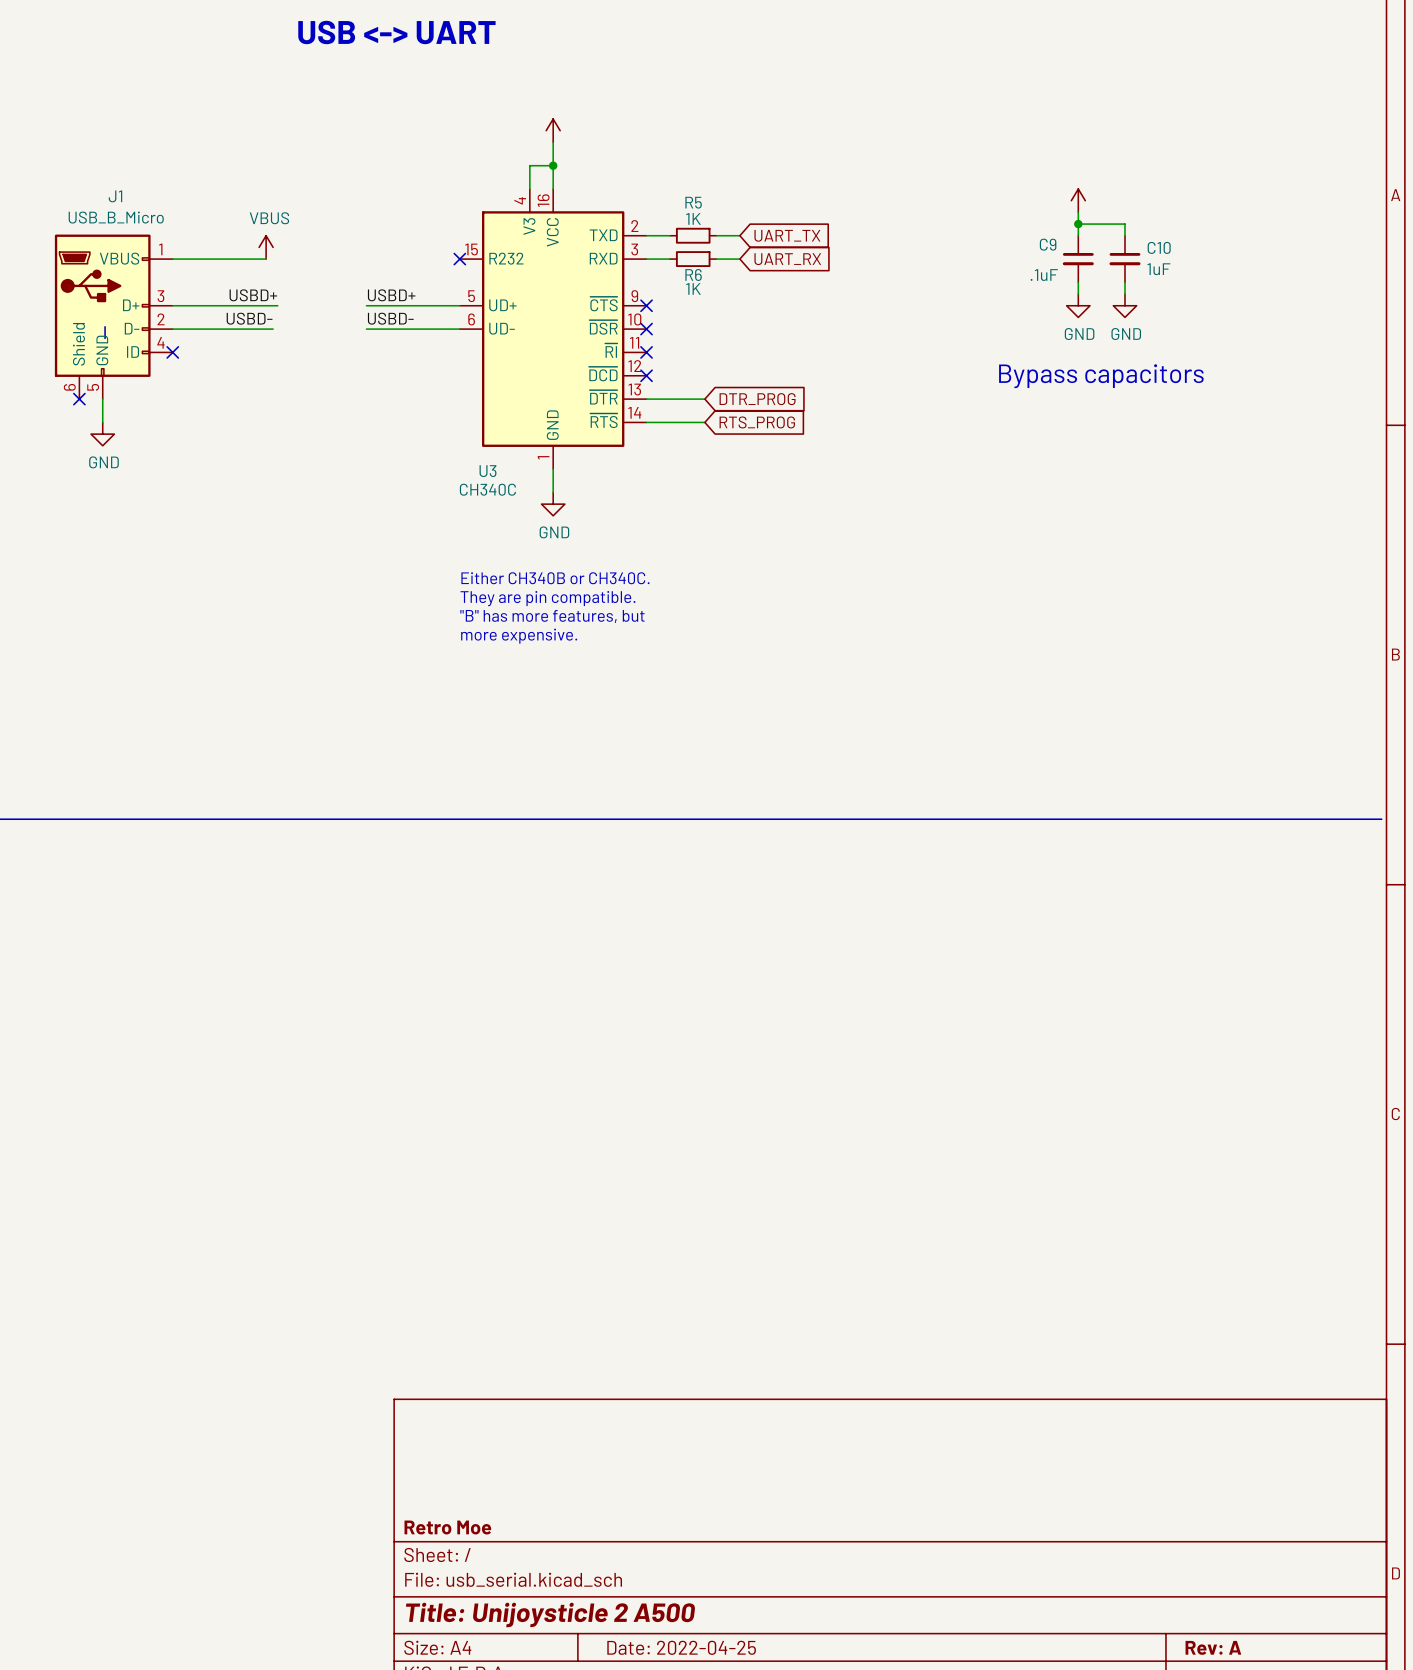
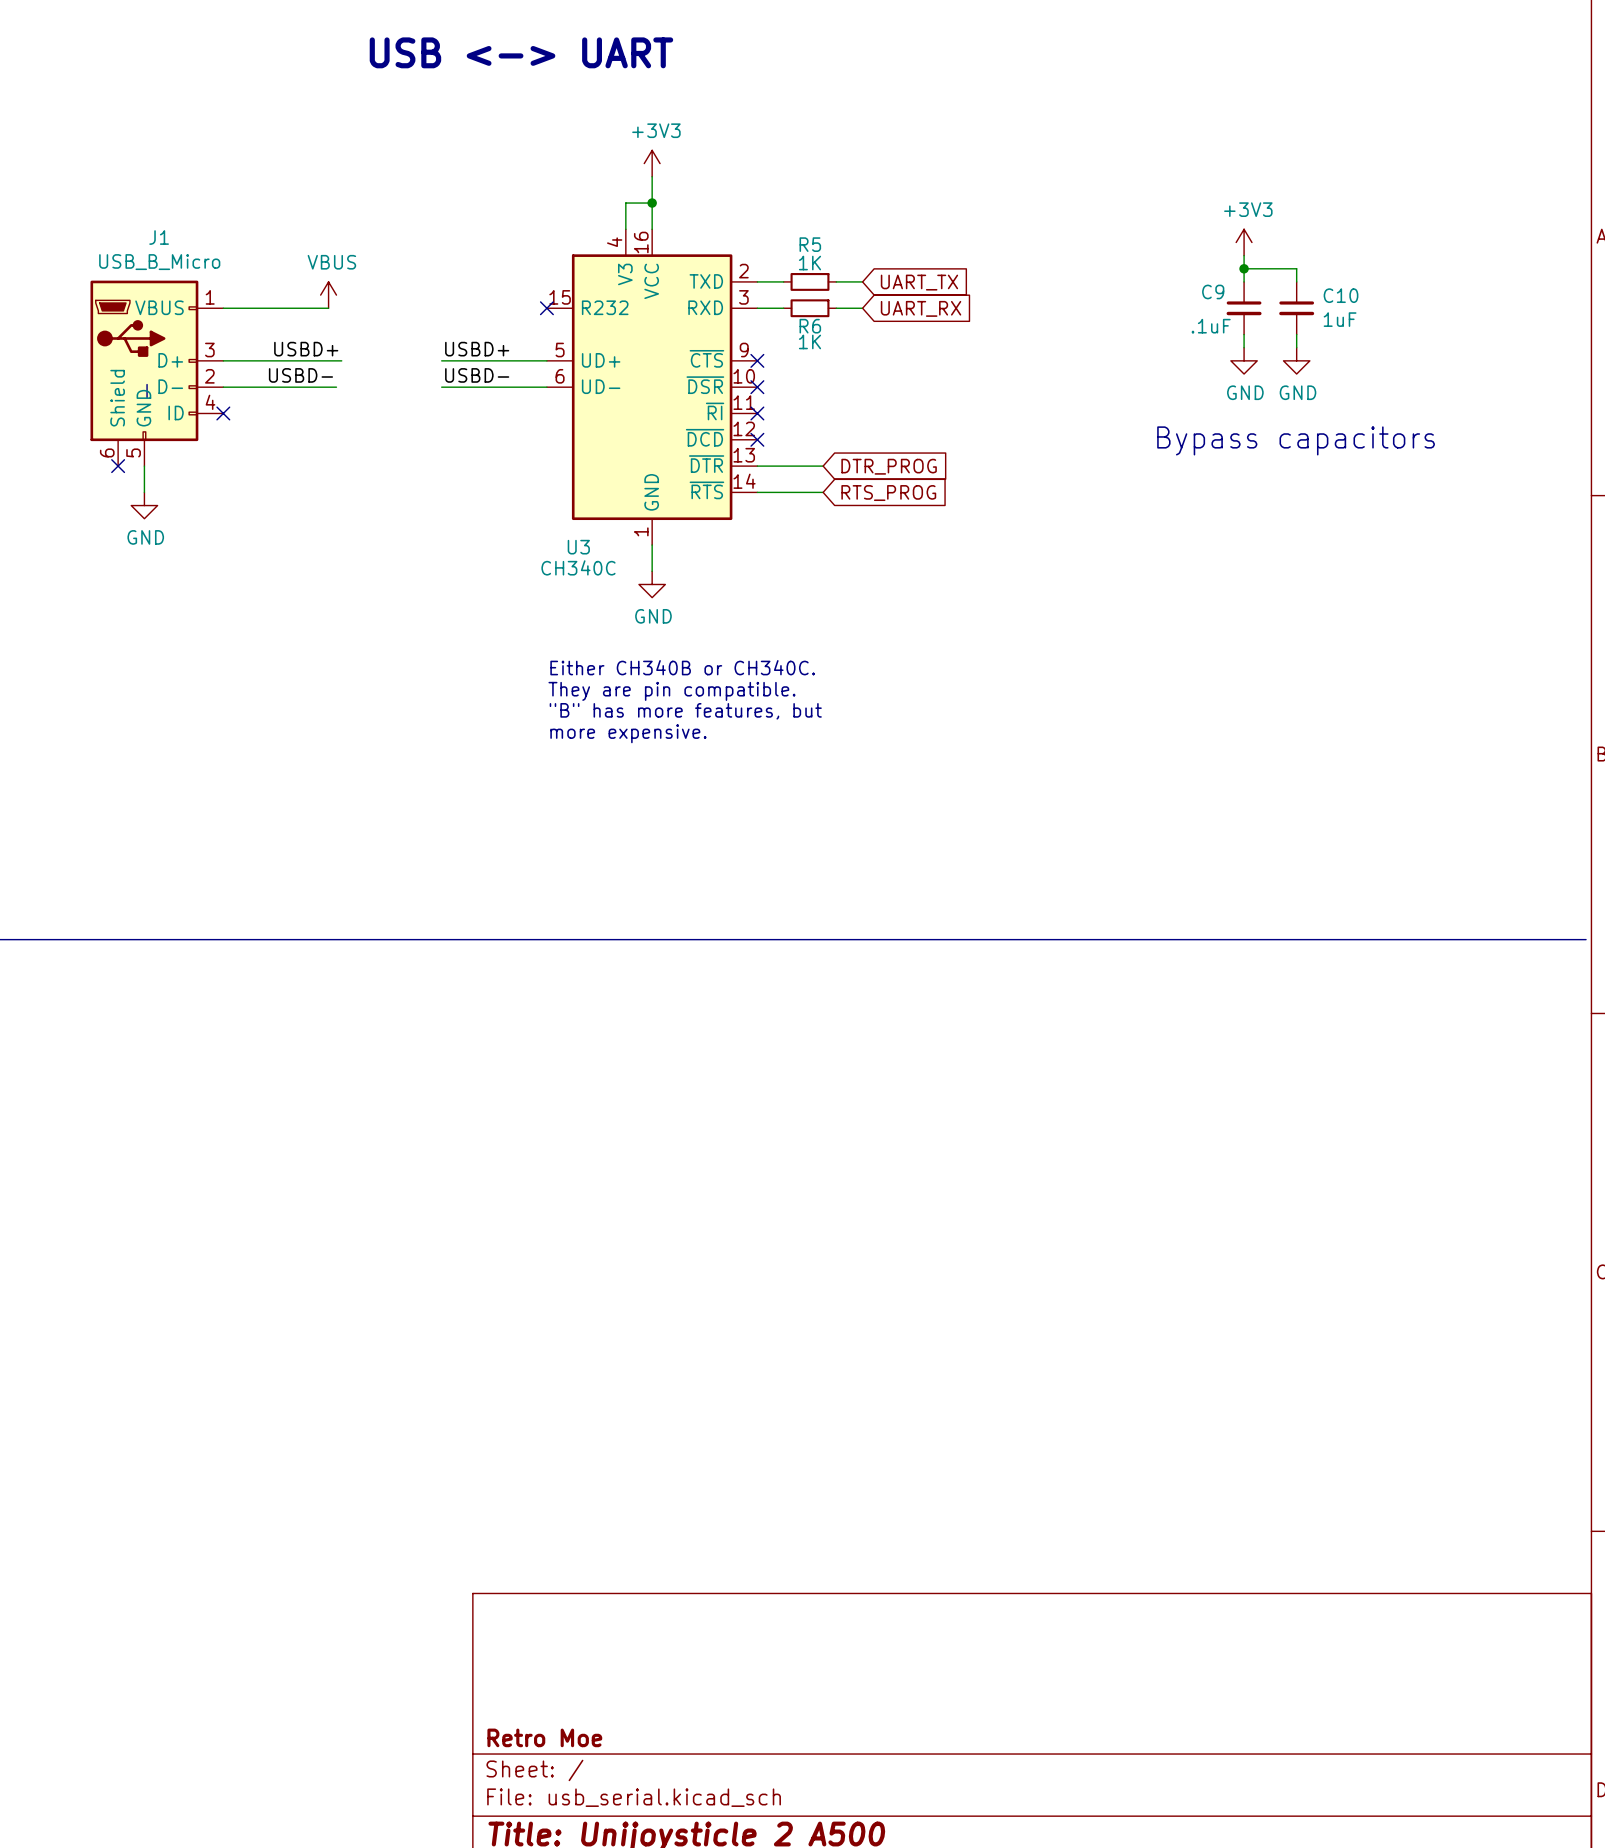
power symbol text: none -> +3V3 (656, 130)
power symbol text: none -> +3V3 (1248, 209)

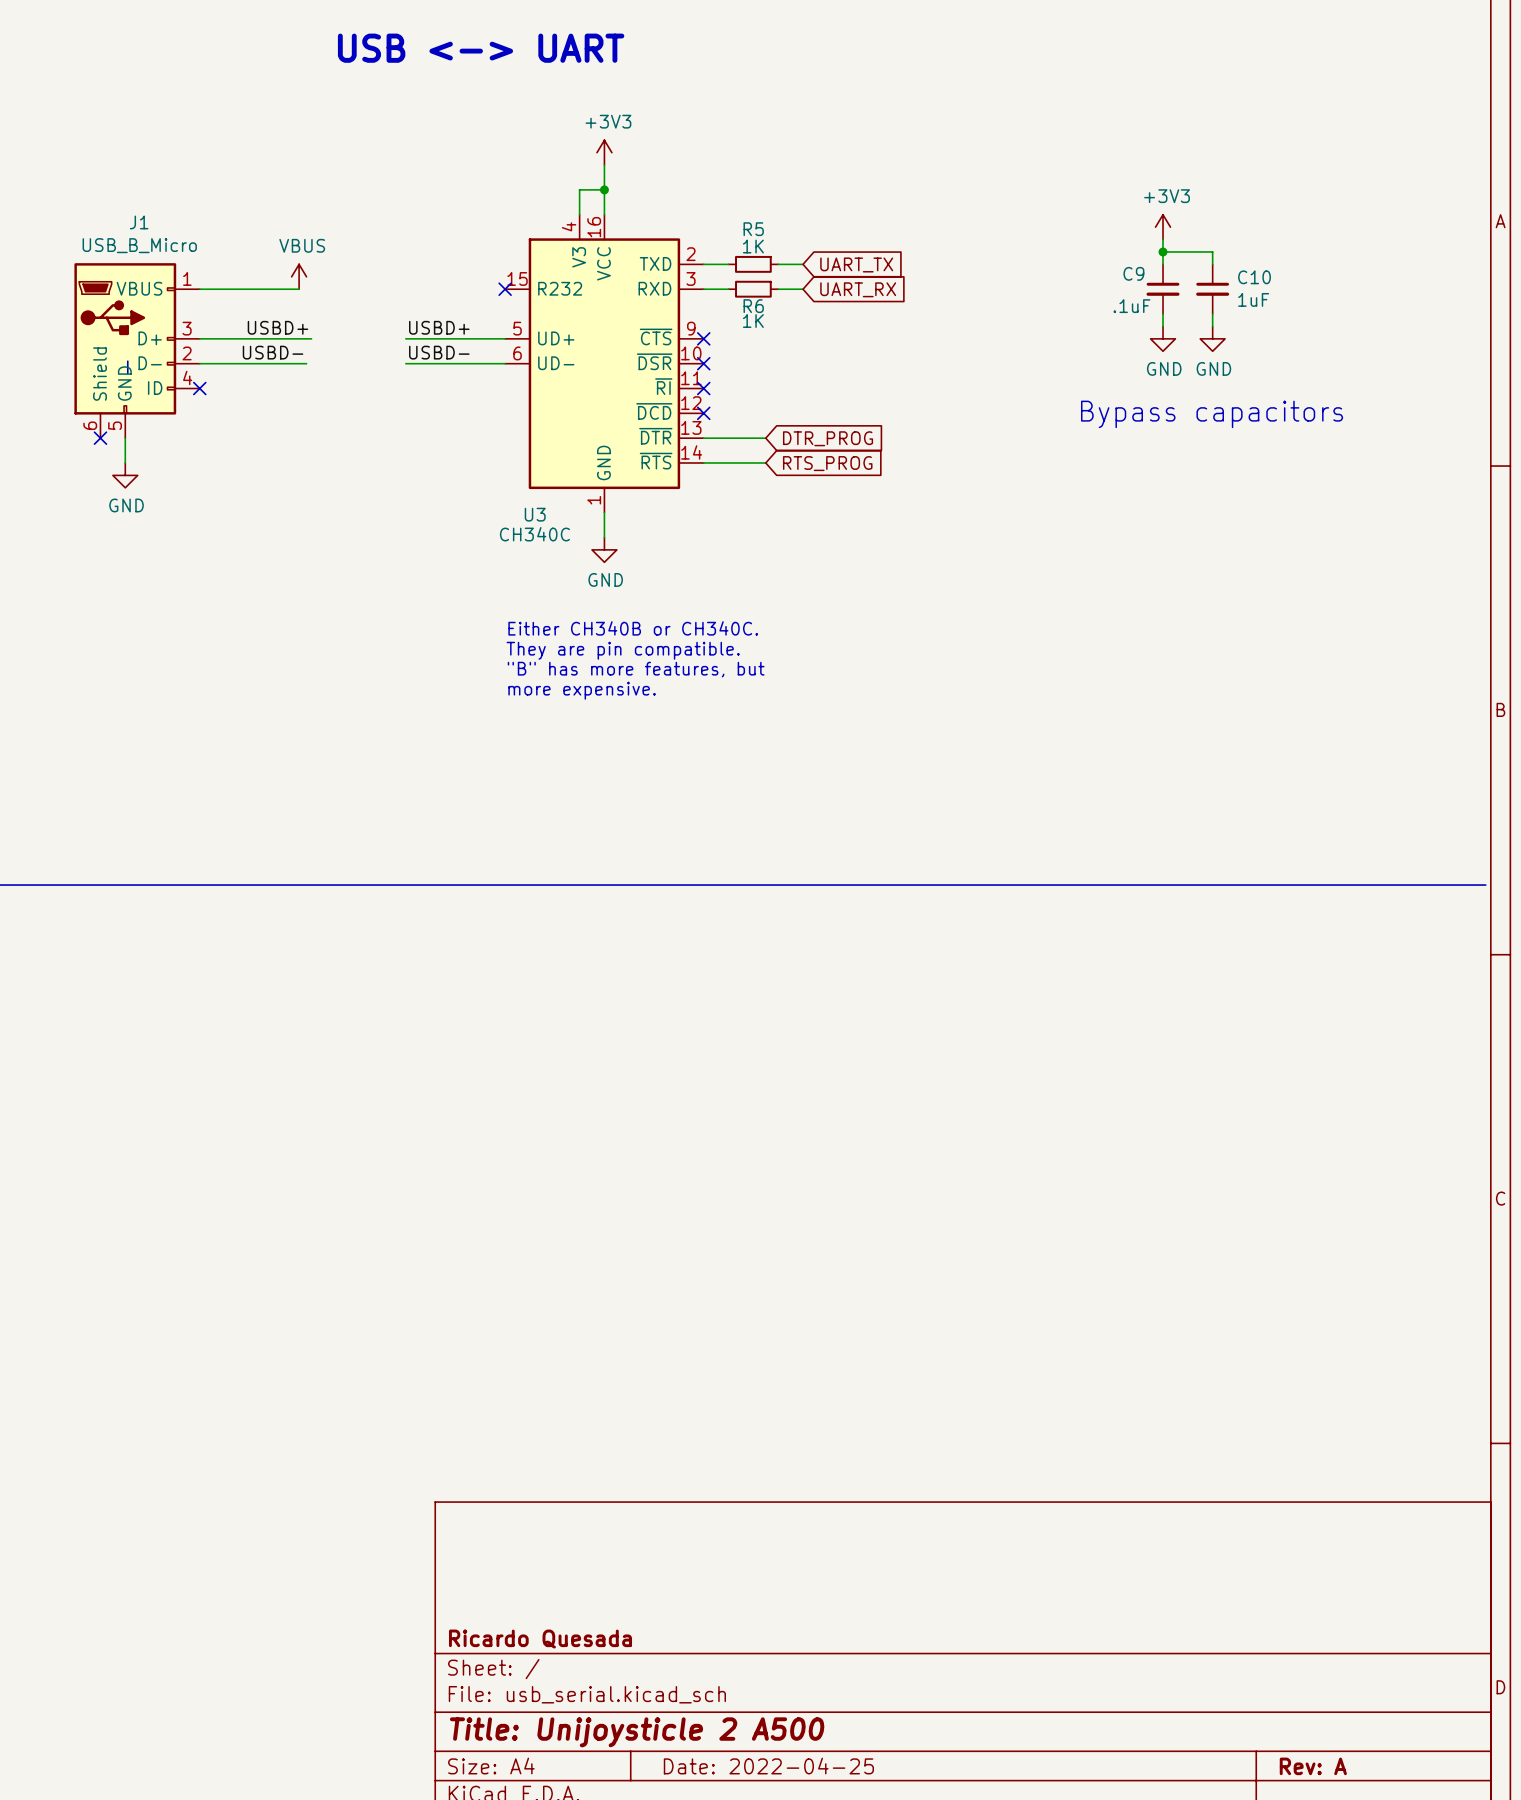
title block: Retro Moe (544, 1737) -> Ricardo Quesada (540, 1639)

